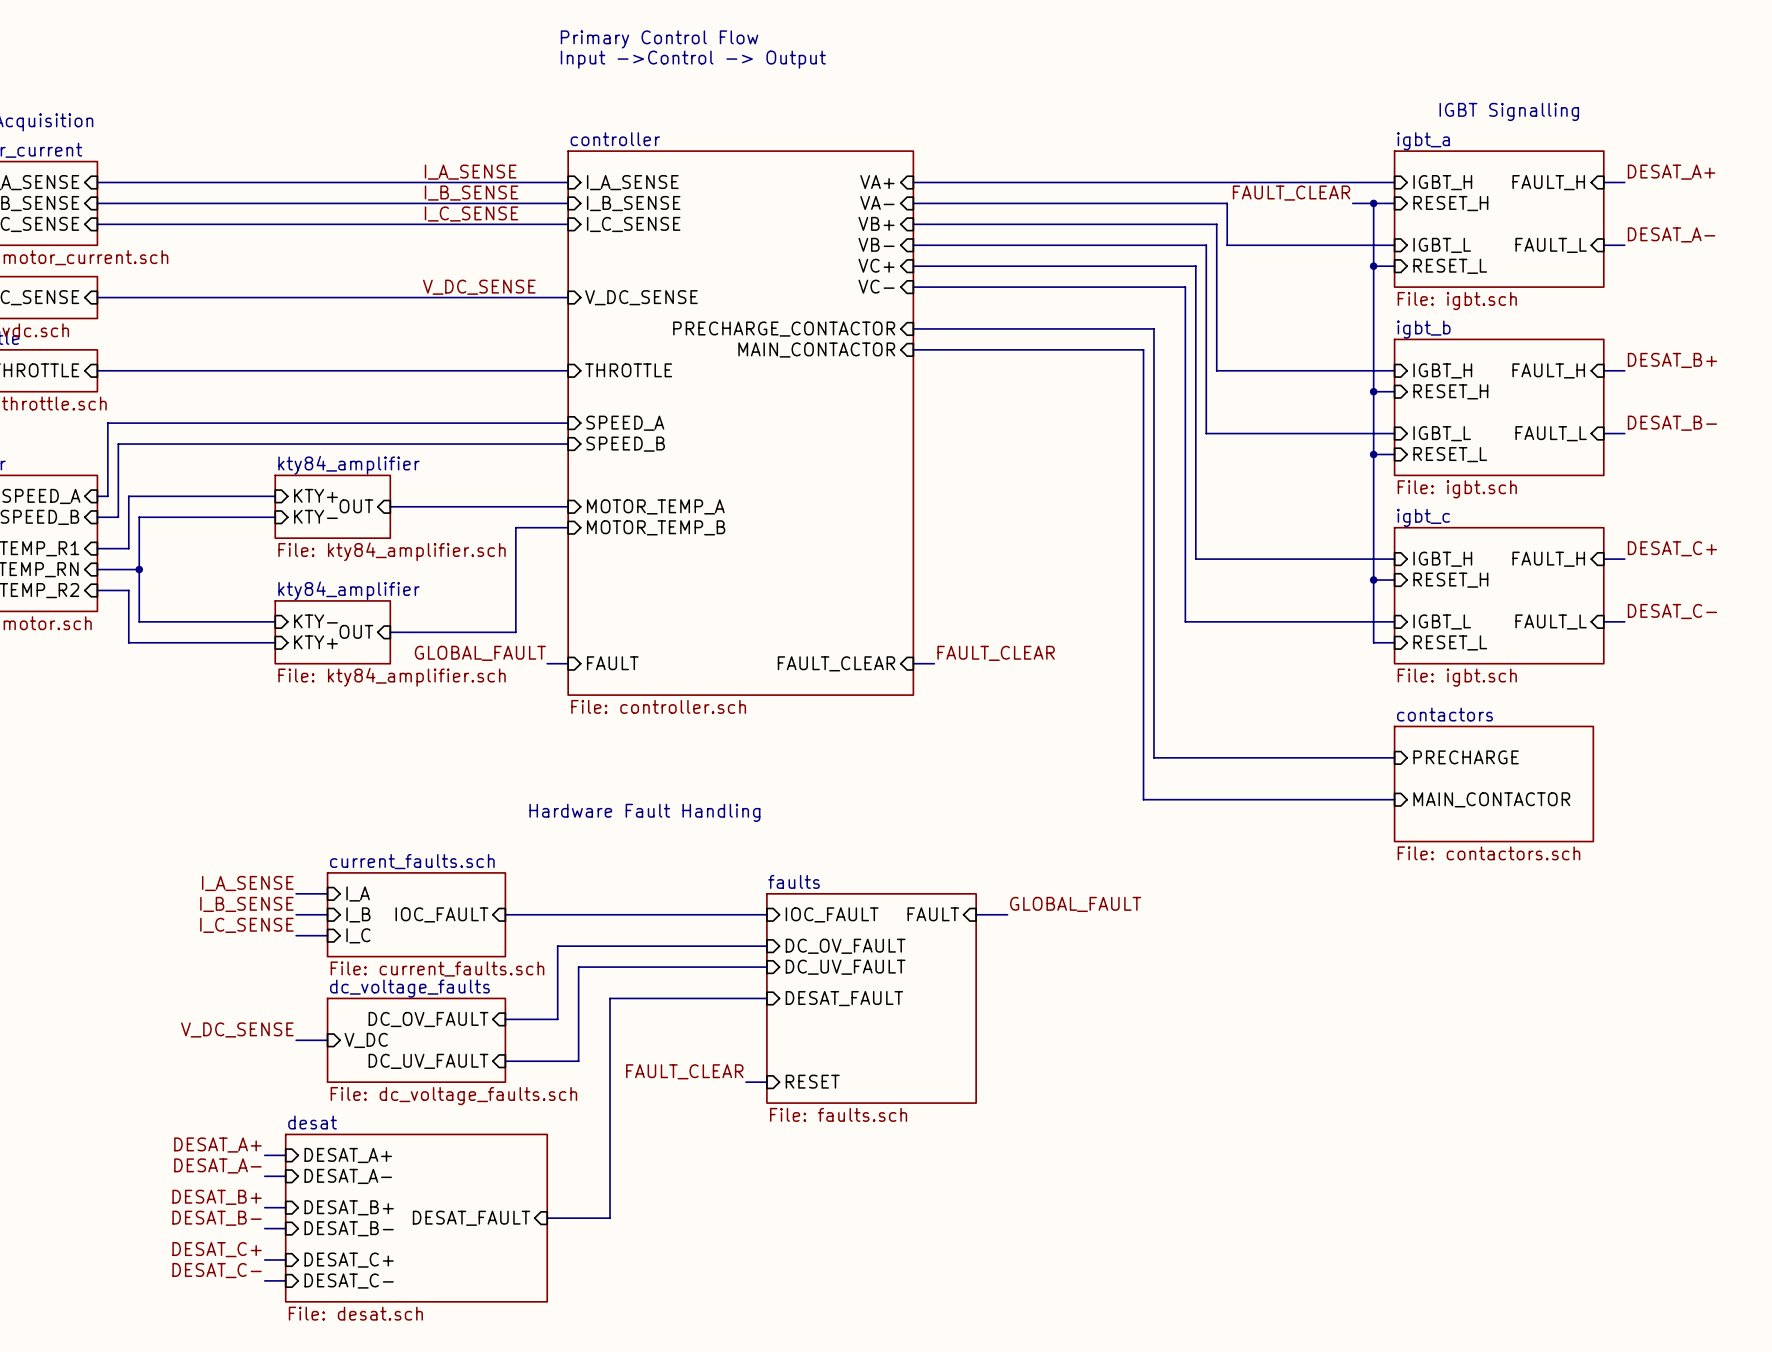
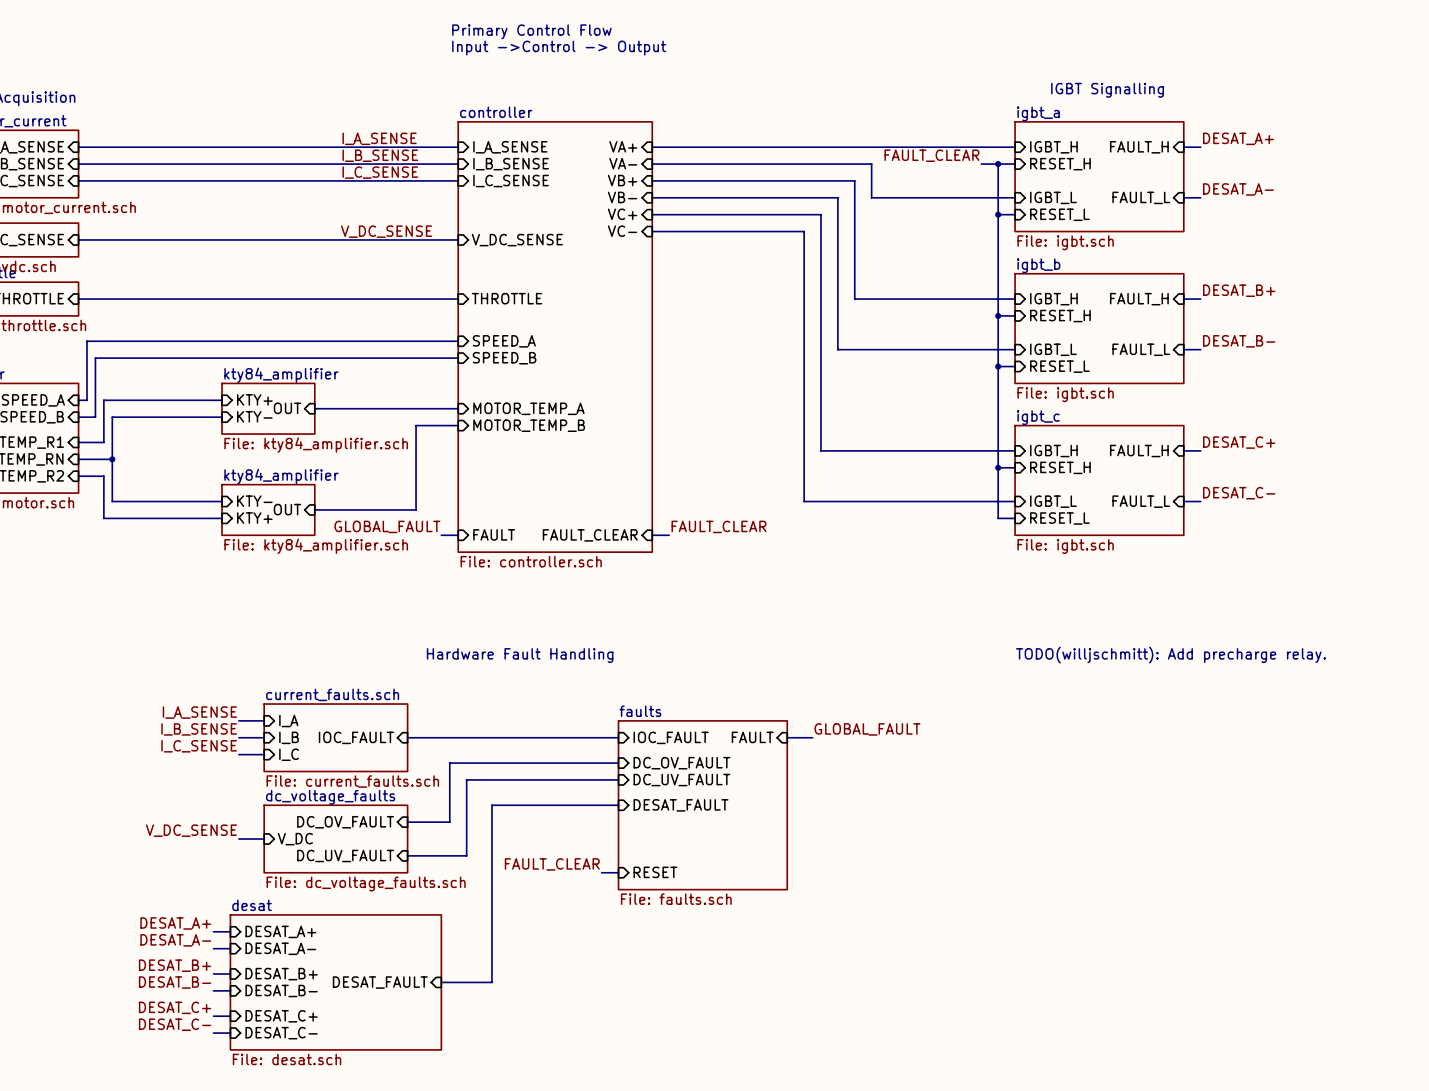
text position: IGBT Signalling (1509, 111) -> IGBT Signalling (1107, 90)
label position: DESAT_A+ (1671, 172) -> DESAT_A+ (1238, 138)
wire: none -> (652, 147) (736, 147)
sheet pin position: VA+ (877, 182) -> VA+ (623, 146)
wire: (1258, 182) (1394, 182) -> none
sheet pin: none -> IGBT_H (1053, 147)
sheet pin: none -> FAULT_H (1139, 147)
sheet pin: IGBT_H (1442, 182) -> none
sheet pin: FAULT_H (1548, 182) -> none
wire: (1603, 182) (1624, 182) -> (1183, 147) (1200, 147)
label position: FAULT_CLEAR (1291, 193) -> FAULT_CLEAR (931, 155)
sheet pin position: VA- (877, 202) -> VA- (623, 163)
wire: none -> (652, 164) (736, 164)
wire: (1080, 203) (1216, 203) -> none
wire: (1227, 203) (1227, 245) -> (972, 197) (989, 197)
wire: none -> (989, 164) (1015, 164)
junction: none -> (998, 164)
sheet pin: none -> RESET_H (1060, 164)
wire: (1352, 203) (1394, 203) -> none
wire: (1373, 203) (1373, 642) (1394, 642) -> (998, 164) (998, 518) (1015, 518)
junction: (1373, 203) -> none
sheet pin: RESET_H (1450, 203) -> none
sheet igbt_a position: (1499, 219) -> (1099, 176)
sheet pin position: VB+ (876, 223) -> VB+ (622, 180)
wire: none -> (652, 180) (736, 180)
wire: (1059, 224) (1216, 224) (1216, 370) -> (854, 180) (854, 299) (981, 299)
label position: DESAT_A- (1671, 234) -> DESAT_A- (1238, 189)
sheet pin position: VB- (876, 244) -> VB- (622, 197)
wire: none -> (652, 197) (736, 197)
wire: (1038, 245) (1080, 245) -> (871, 164) (871, 197)
wire: (1206, 245) (1206, 433) -> (837, 197) (837, 349) (972, 349)
wire: (1258, 245) (1394, 245) -> none
sheet pin: none -> IGBT_L (1053, 197)
sheet pin: none -> FAULT_L (1141, 197)
sheet pin: IGBT_L (1442, 245) -> none
sheet pin: FAULT_L (1551, 245) -> none
wire: (1603, 245) (1624, 245) -> (1183, 197) (1200, 197)
sheet pin position: VC+ (876, 265) -> VC+ (622, 214)
wire: none -> (652, 214) (736, 214)
wire: (1017, 266) (1195, 266) (1195, 559) -> (821, 214) (821, 450) (964, 450)
junction: none -> (998, 214)
sheet pin: none -> RESET_L (1059, 214)
wire: (1373, 266) (1394, 266) -> (998, 214) (1015, 214)
junction: (1373, 266) -> none
sheet pin: RESET_L (1450, 266) -> none
sheet pin position: VC- (876, 286) -> VC- (622, 231)
wire: none -> (652, 231) (736, 231)
wire: (997, 287) (1185, 287) (1185, 621) -> (804, 231) (804, 501) (956, 501)
wire: (913, 328) (1153, 328) (1153, 757) (1394, 757) -> none
sheet pin: PRECHARGE_CONTACTOR (784, 329) -> none
wire: (913, 349) (1143, 349) (1143, 799) (1394, 799) -> none
sheet pin: MAIN_CONTACTOR (816, 350) -> none
label position: DESAT_B+ (1672, 360) -> DESAT_B+ (1239, 290)
wire: (1258, 370) (1394, 370) -> none
sheet pin: none -> IGBT_H (1053, 299)
sheet pin: none -> FAULT_H (1139, 299)
sheet pin: IGBT_H (1442, 370) -> none
sheet pin: FAULT_H (1548, 370) -> none
wire: (1603, 370) (1624, 370) -> (1183, 299) (1200, 299)
junction: none -> (998, 315)
sheet pin: none -> RESET_H (1060, 316)
wire: (1373, 391) (1394, 391) -> (998, 315) (1015, 315)
junction: (1373, 391) -> none
sheet pin: RESET_H (1450, 391) -> none
sheet igbt_b position: (1499, 407) -> (1099, 328)
sheet controller: none -> File: controller.sch (555, 337)
sheet controller: File: controller.sch (740, 423) -> none
label position: DESAT_B- (1672, 423) -> DESAT_B- (1239, 341)
wire: (1258, 433) (1394, 433) -> none
sheet pin: none -> IGBT_L (1053, 349)
sheet pin: none -> FAULT_L (1141, 349)
sheet pin: IGBT_L (1442, 433) -> none
sheet pin: FAULT_L (1551, 433) -> none
wire: (1603, 433) (1624, 433) -> (1183, 349) (1200, 349)
junction: none -> (998, 366)
sheet pin: none -> RESET_L (1059, 366)
wire: (1373, 454) (1394, 454) -> (998, 366) (1015, 366)
junction: (1373, 454) -> none
sheet pin: RESET_L (1450, 454) -> none
label position: DESAT_C+ (1672, 548) -> DESAT_C+ (1239, 442)
wire: (1258, 559) (1394, 559) -> none
sheet pin: none -> IGBT_H (1053, 451)
sheet pin: none -> FAULT_H (1139, 451)
sheet pin: IGBT_H (1442, 559) -> none
sheet pin: FAULT_H (1548, 559) -> none
wire: (1603, 559) (1624, 559) -> (1183, 450) (1200, 450)
junction: none -> (998, 467)
sheet pin: none -> RESET_H (1060, 467)
wire: (1373, 580) (1394, 580) -> (998, 467) (1015, 467)
junction: (1373, 580) -> none
sheet pin: RESET_H (1450, 580) -> none
sheet igbt_c position: (1499, 595) -> (1099, 480)
label position: DESAT_C- (1672, 611) -> DESAT_C- (1239, 493)
wire: (1258, 621) (1394, 621) -> none
sheet pin: none -> IGBT_L (1053, 501)
sheet pin: none -> FAULT_L (1141, 501)
sheet pin: IGBT_L (1442, 621) -> none
sheet pin: FAULT_L (1551, 621) -> none
wire: (1603, 621) (1624, 621) -> (1183, 501) (1200, 501)
sheet pin: none -> RESET_L (1059, 518)
sheet pin: RESET_L (1450, 642) -> none
label position: FAULT_CLEAR (996, 653) -> FAULT_CLEAR (718, 526)
sheet pin position: FAULT_CLEAR (836, 663) -> FAULT_CLEAR (590, 535)
wire: (913, 663) (934, 663) -> (652, 535) (669, 535)
sheet pin: PRECHARGE (1466, 757) -> none
sheet contactors: File: contactors.sch (1493, 784) -> none
sheet pin: MAIN_CONTACTOR (1491, 799) -> none
text: none -> TODO(willjschmitt): Add precharge relay. (1170, 655)

